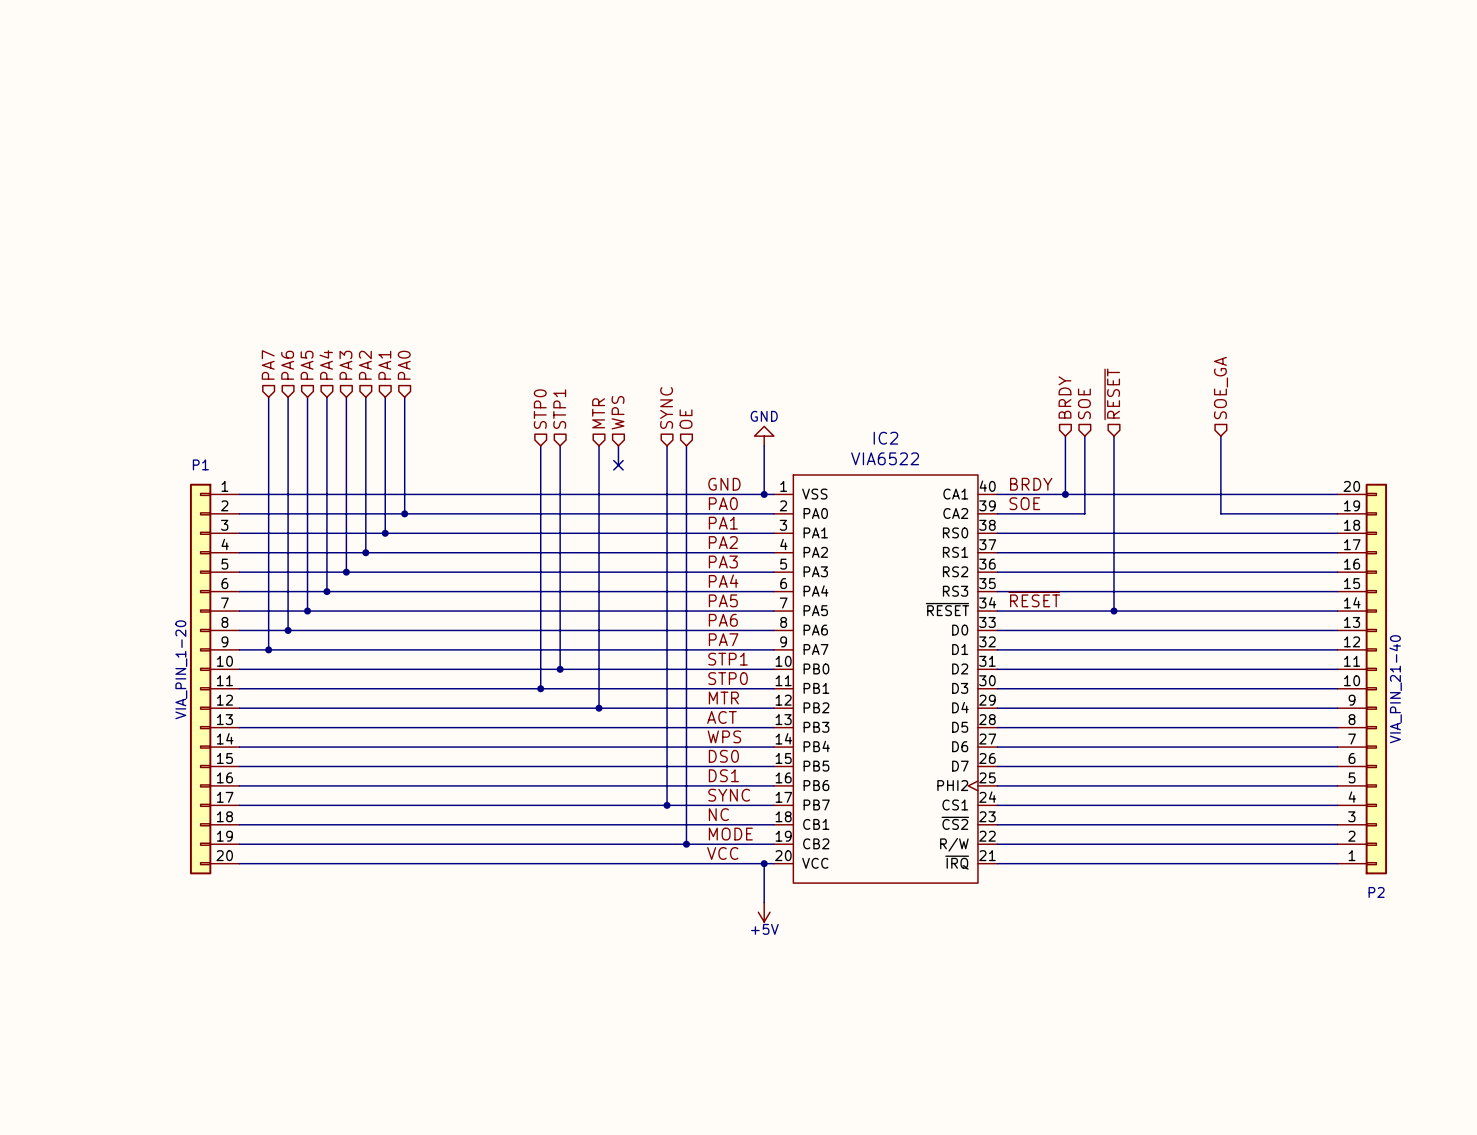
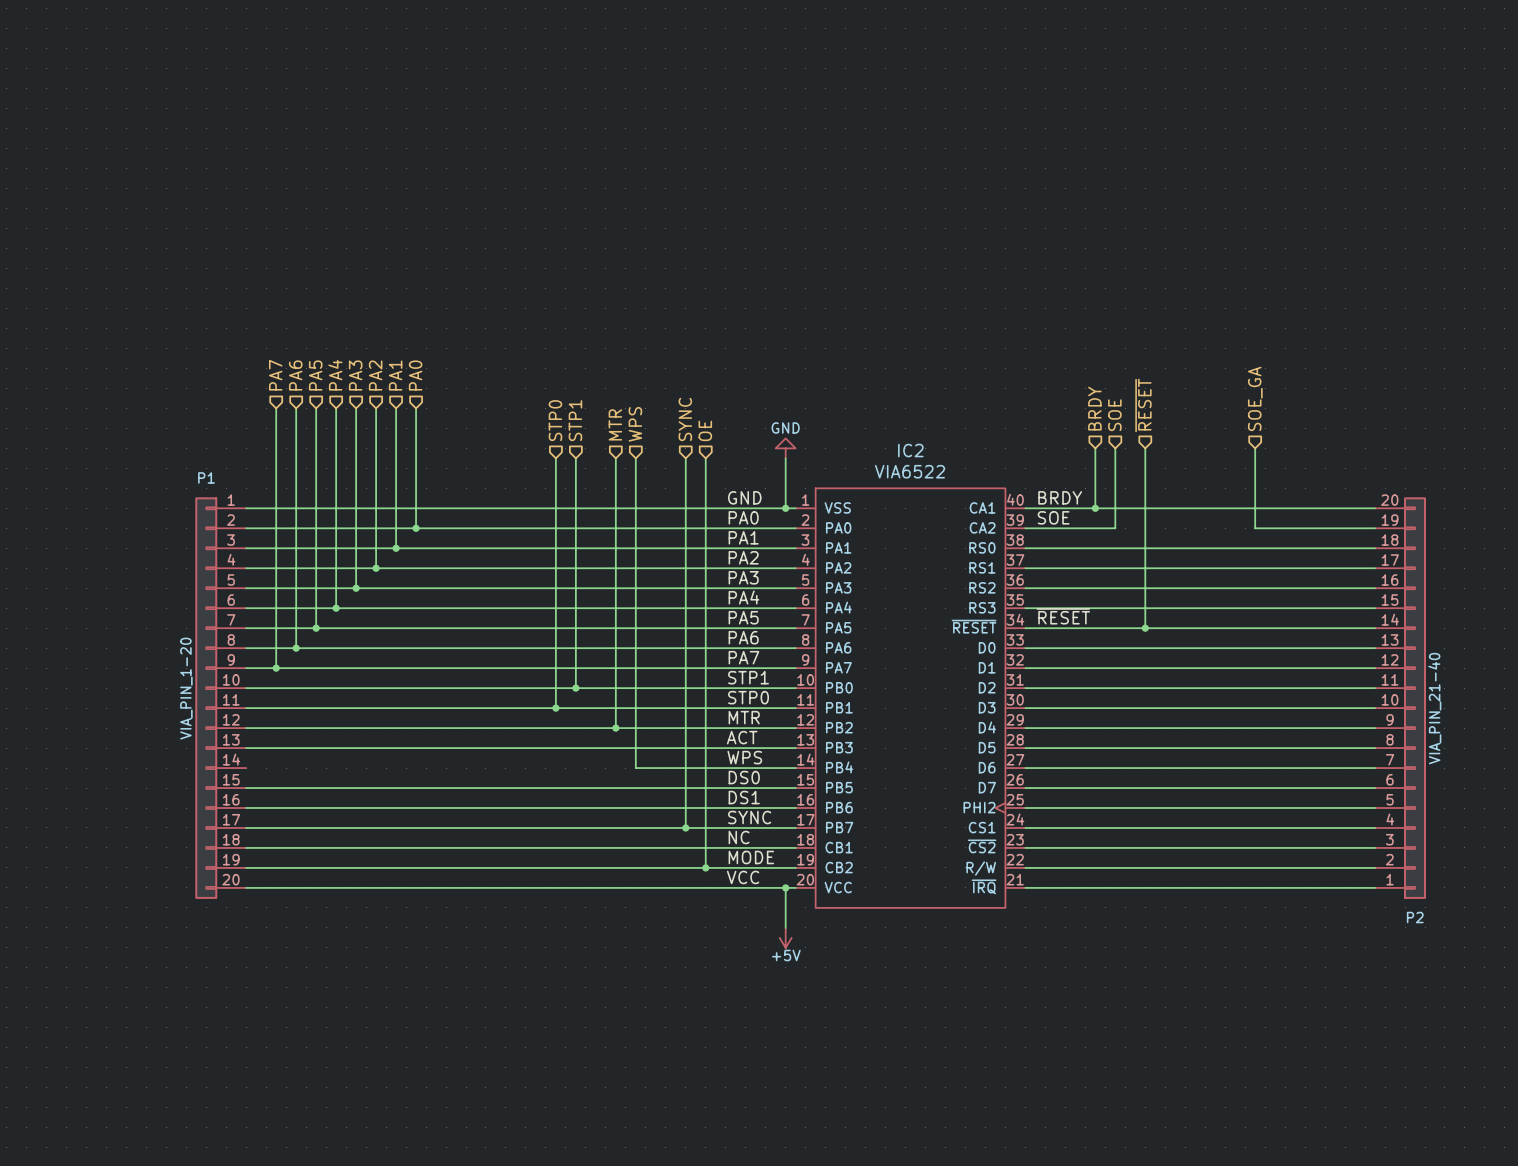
no-connect mark: (618, 465) -> none
wire: (239, 747) (618, 747) -> (635, 478) (635, 768)

